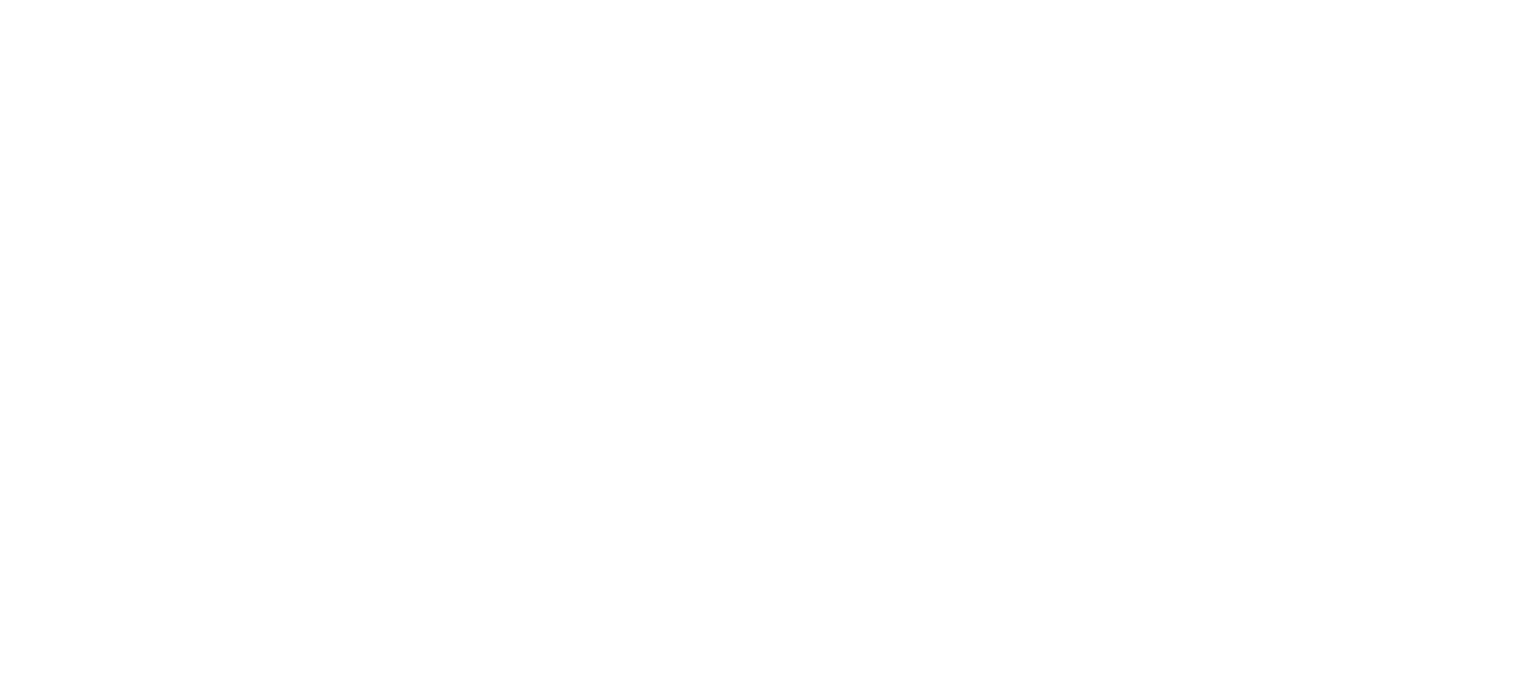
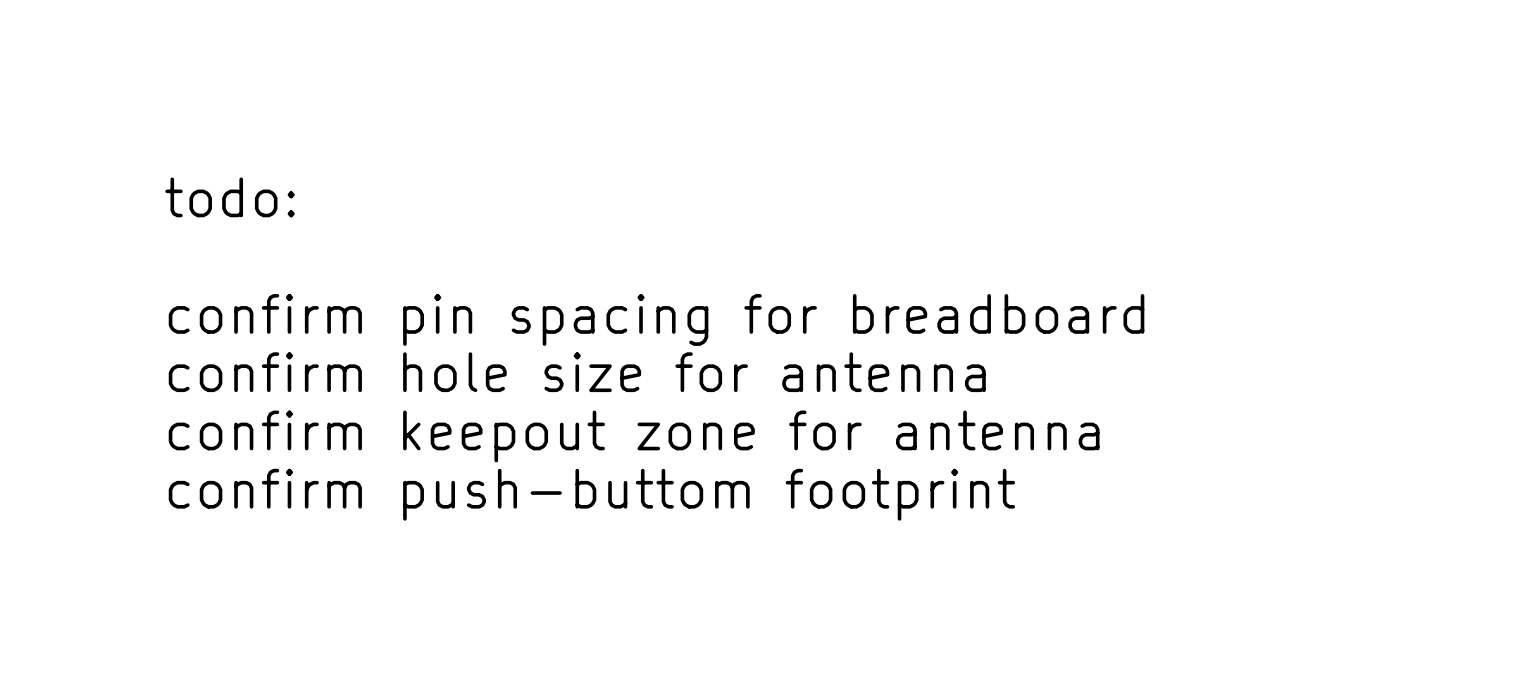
text: none -> todo: (230, 197)
text: none -> confirm pin spacing for breadboard (656, 319)
text: none -> confirm hole size for antenna (577, 372)
text: none -> confirm keepout zone for antenna (634, 436)
text: none -> confirm push-buttom footprint (591, 494)

